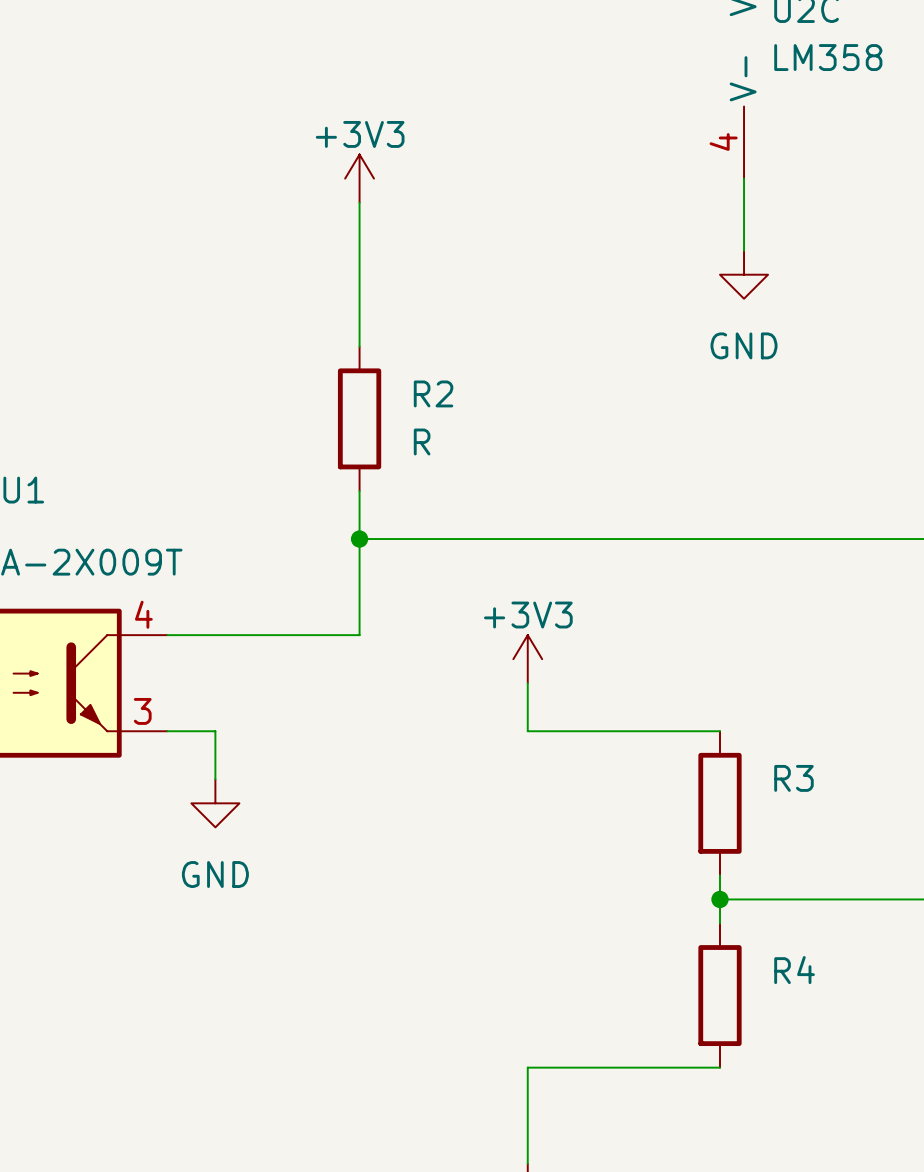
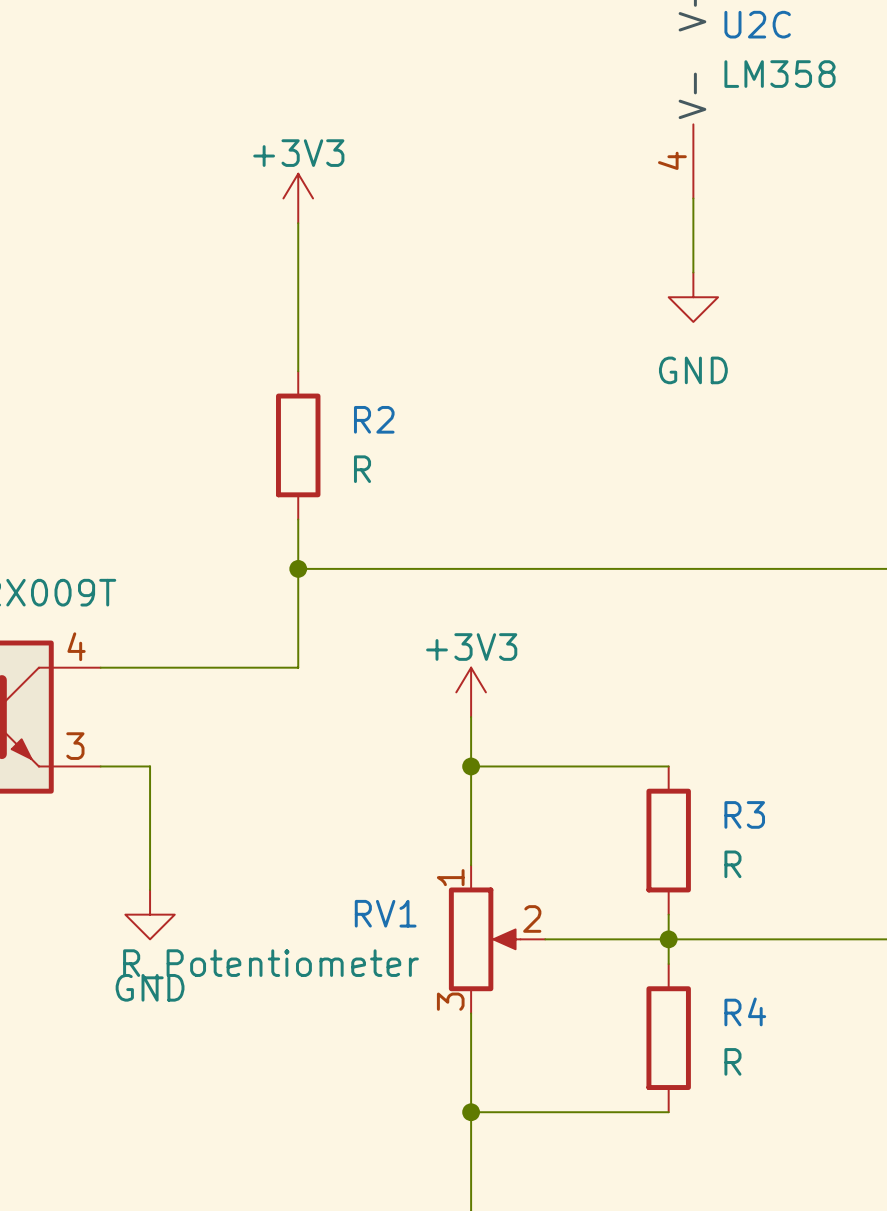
wire: none -> (471, 766) (471, 865)
junction: none -> (471, 766)
wire: none -> (150, 815) (150, 889)
power symbol position: GND (215, 803) -> GND (150, 914)
R3 value: none -> R (732, 864)
RV1: none -> R_Potentiometer (497, 939)
wire: none -> (545, 939) (668, 939)
wire: none -> (471, 1013) (471, 1112)
R4 value: none -> R (732, 1061)
junction: none -> (471, 1112)

